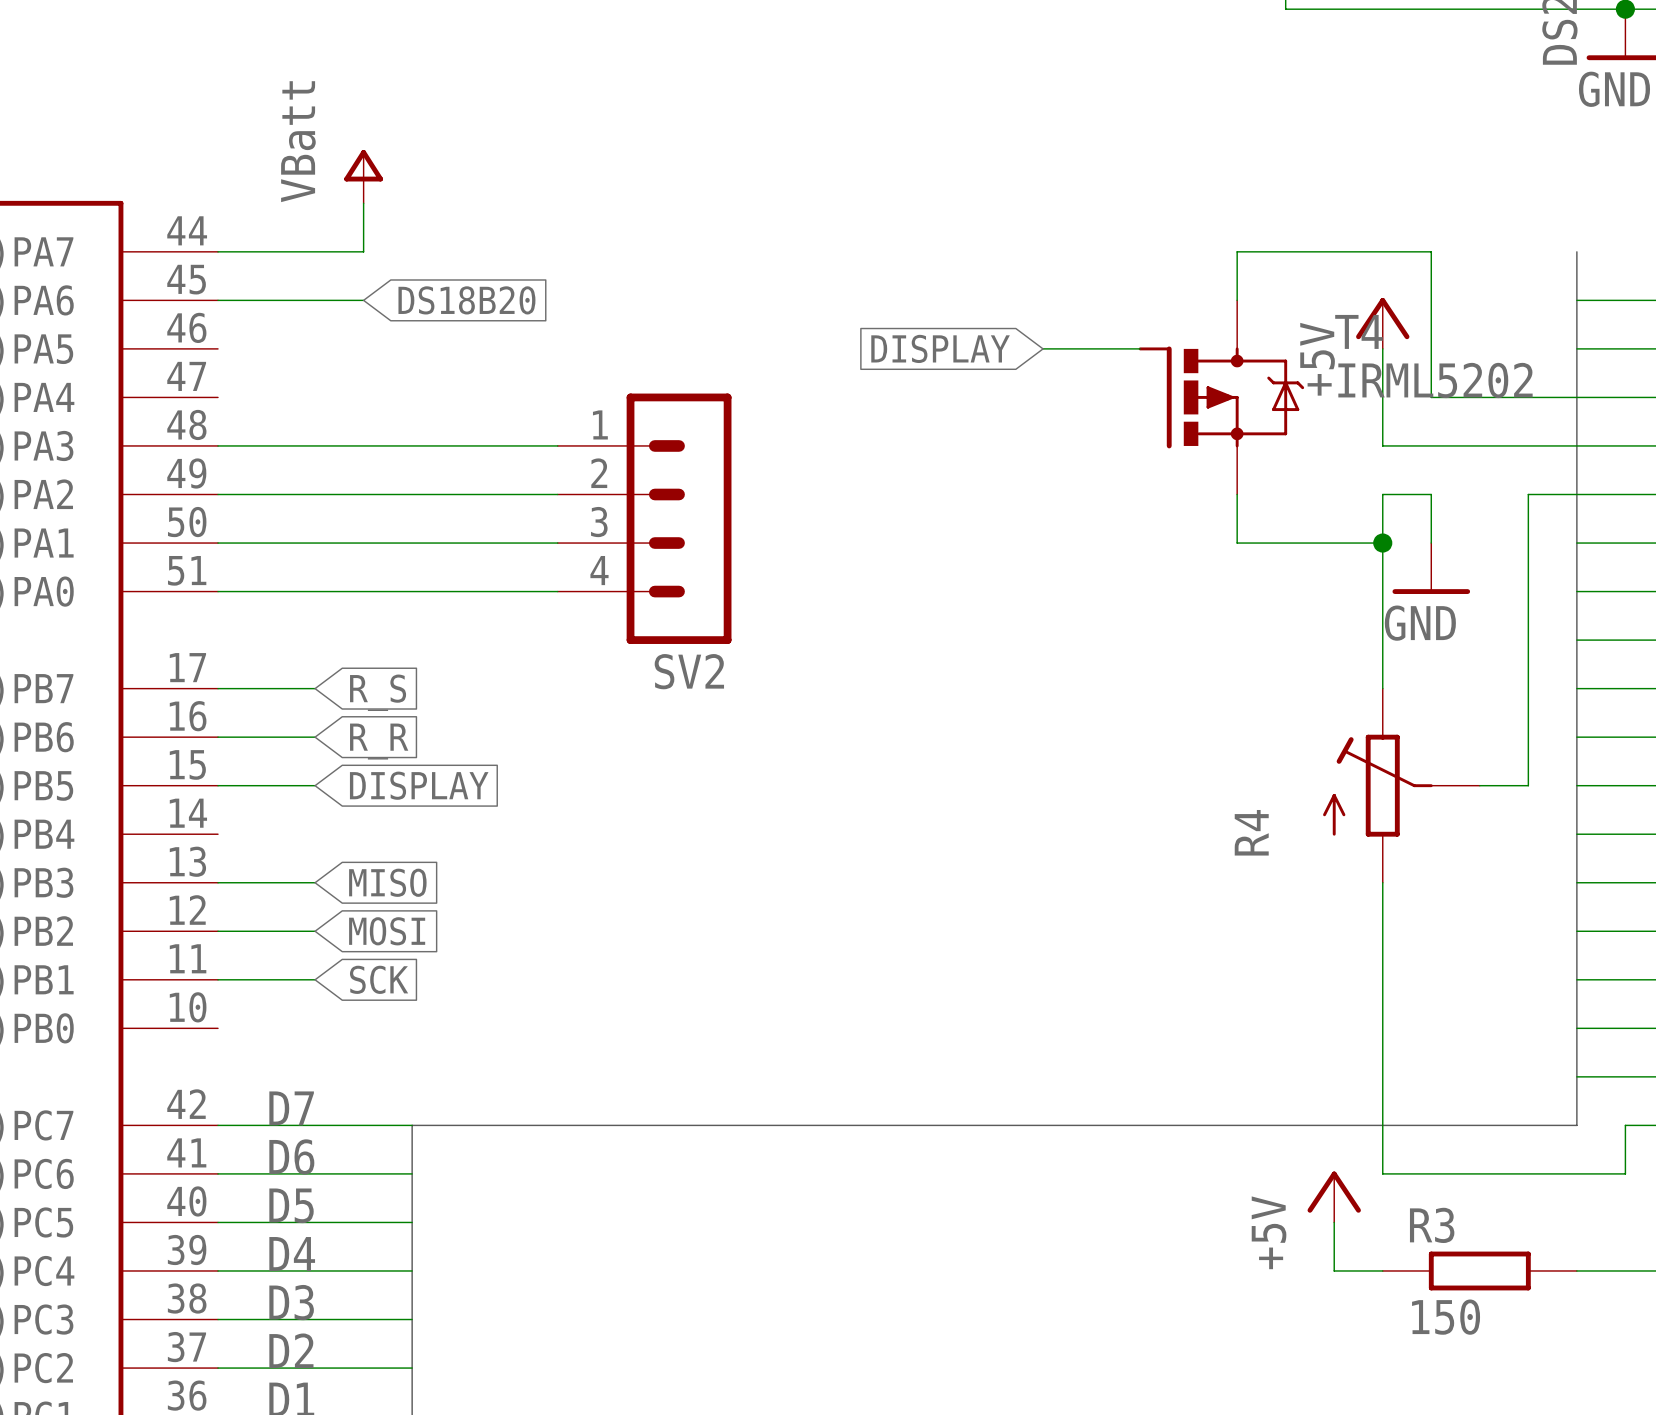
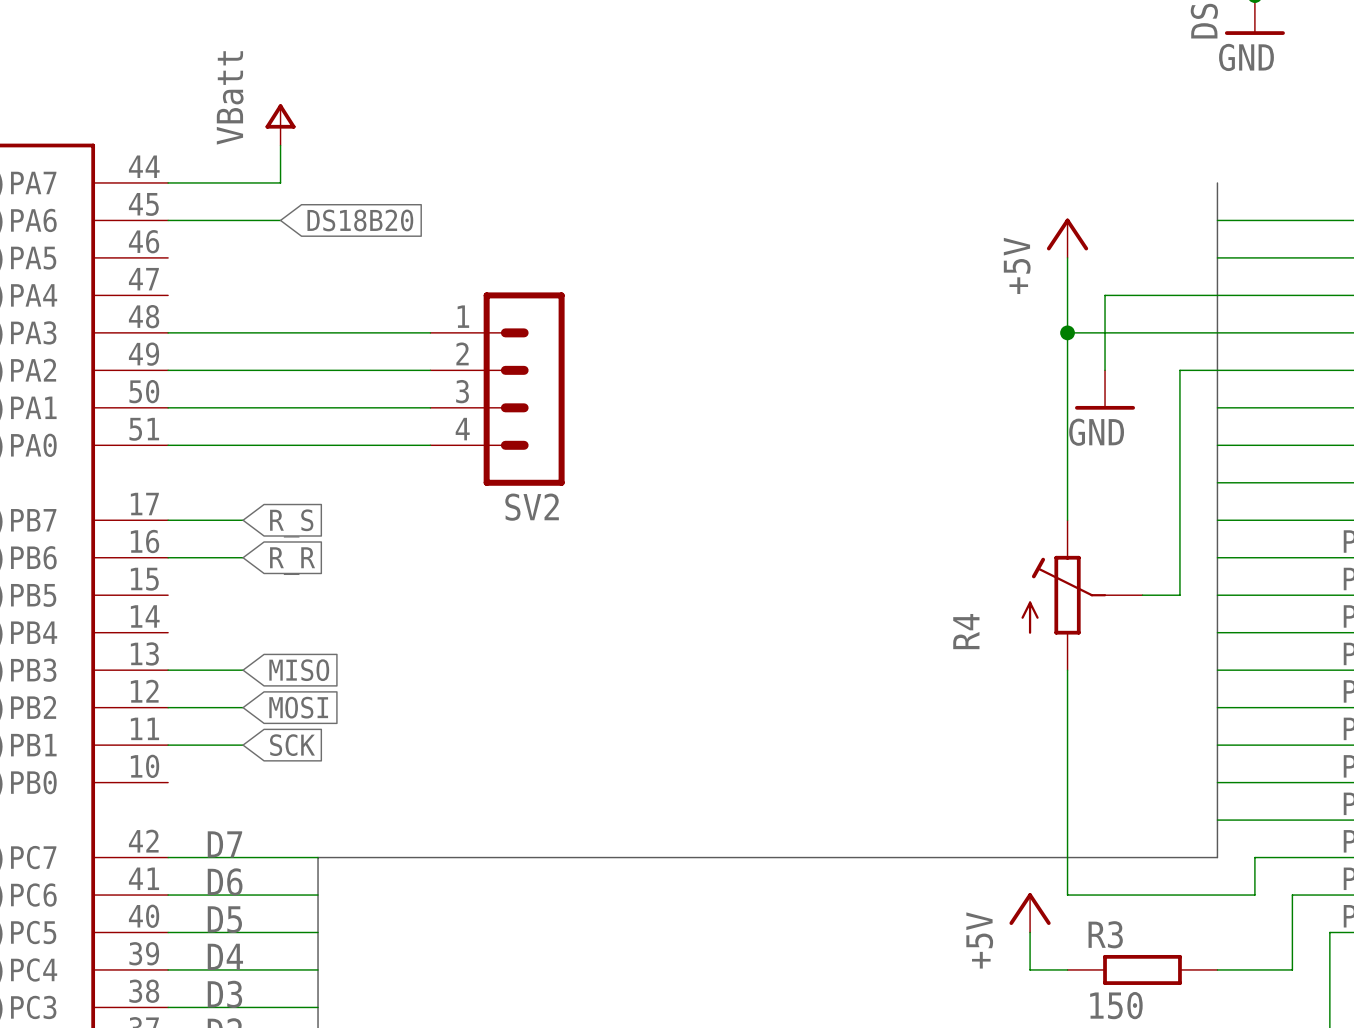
wire: (1237, 300) (1237, 251) (1431, 251) (1431, 397) -> (1105, 370) (1105, 295)
global label: DISPLAY (940, 348) -> none
wire: (1043, 348) (1140, 348) -> none
T4: IRML5202 (1221, 397) -> none
wire: (1237, 494) (1237, 543) (1382, 543) -> none
wire: (1382, 494) (1431, 494) (1431, 543) -> (1067, 370) (1067, 332)
junction position: (1382, 543) -> (1067, 332)
power symbol position: GND (1431, 568) -> GND (1105, 390)
wire: (218, 785) (315, 785) -> none
global label: DISPLAY (419, 785) -> none

